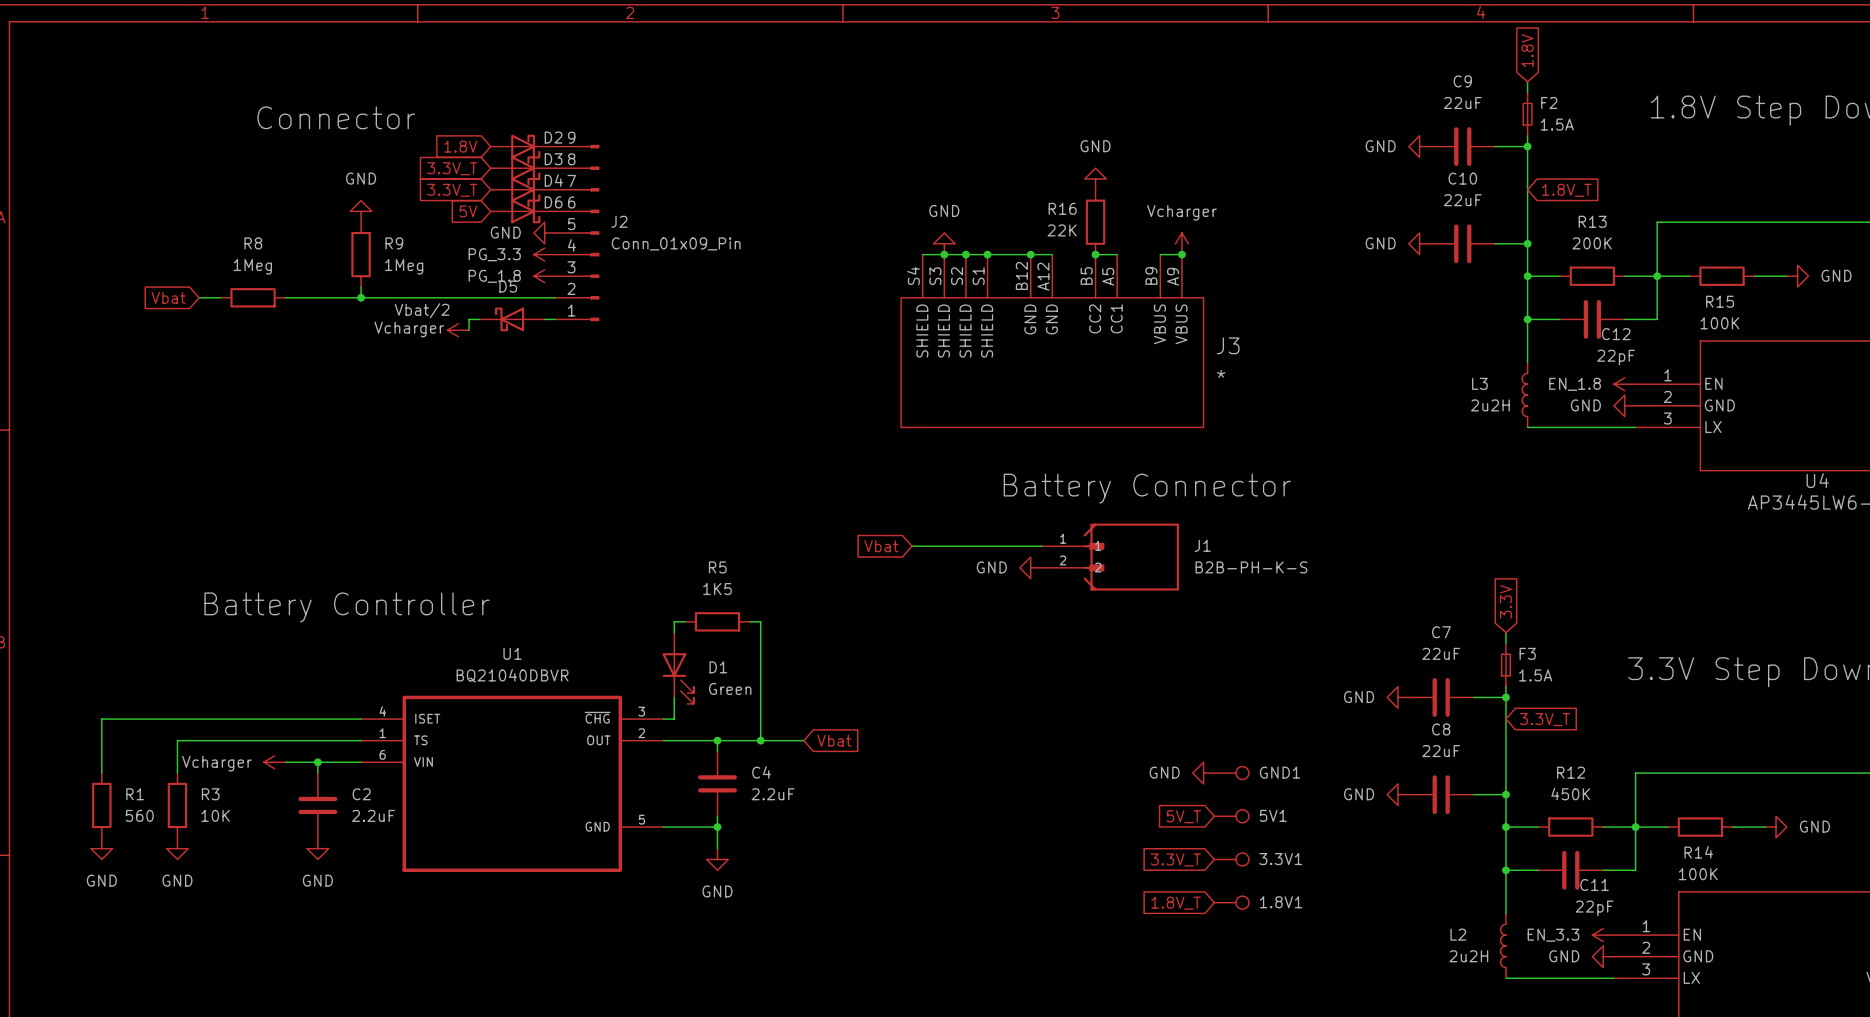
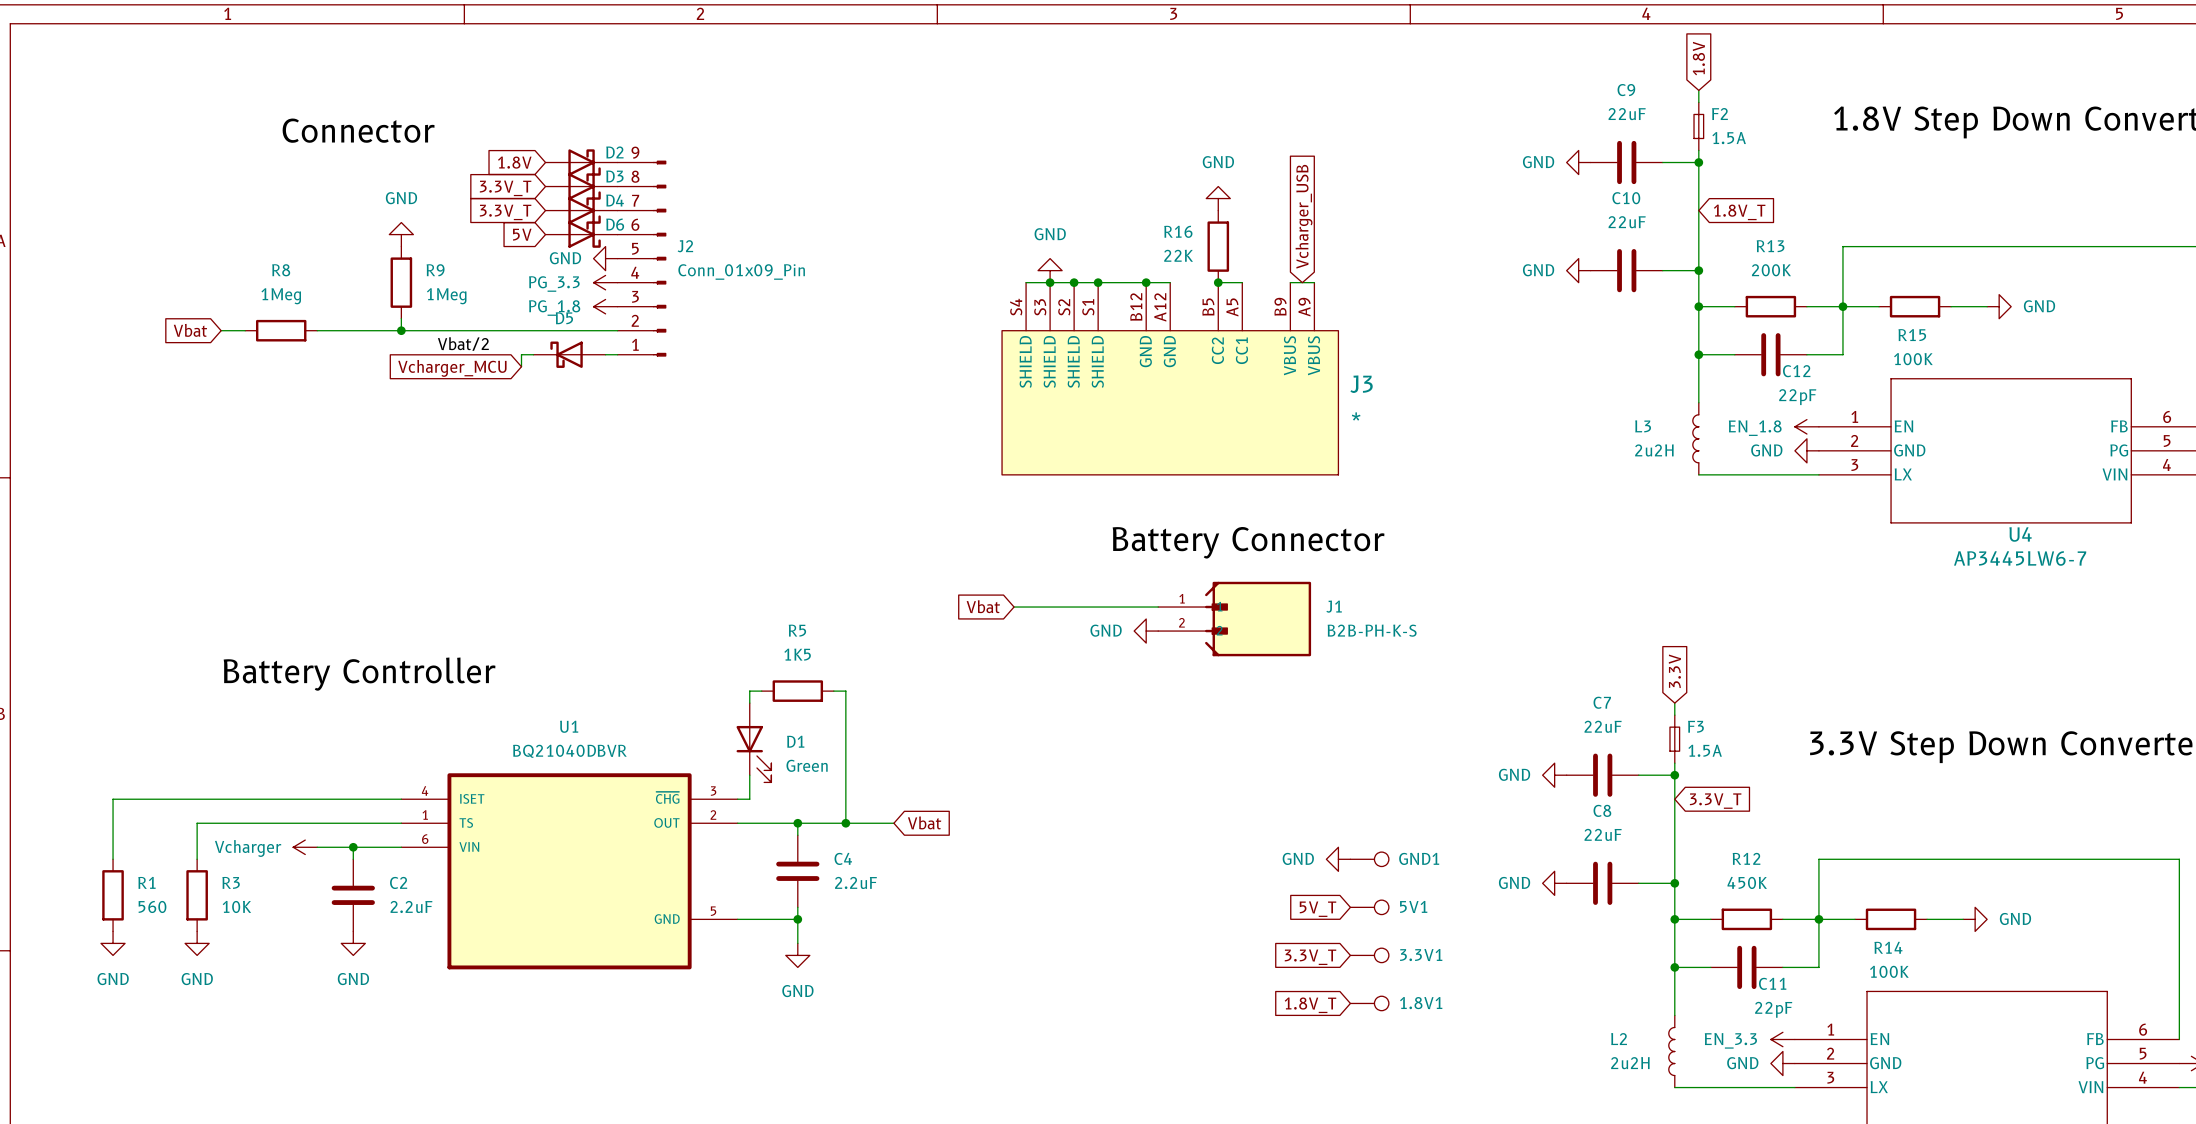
global label: none -> Vcharger_USB (1304, 216)
power symbol: Vcharger (1181, 243) -> none
junction: (1181, 254) -> none
power symbol: Vcharger (458, 330) -> none
global label: none -> Vcharger_MCU (452, 368)

